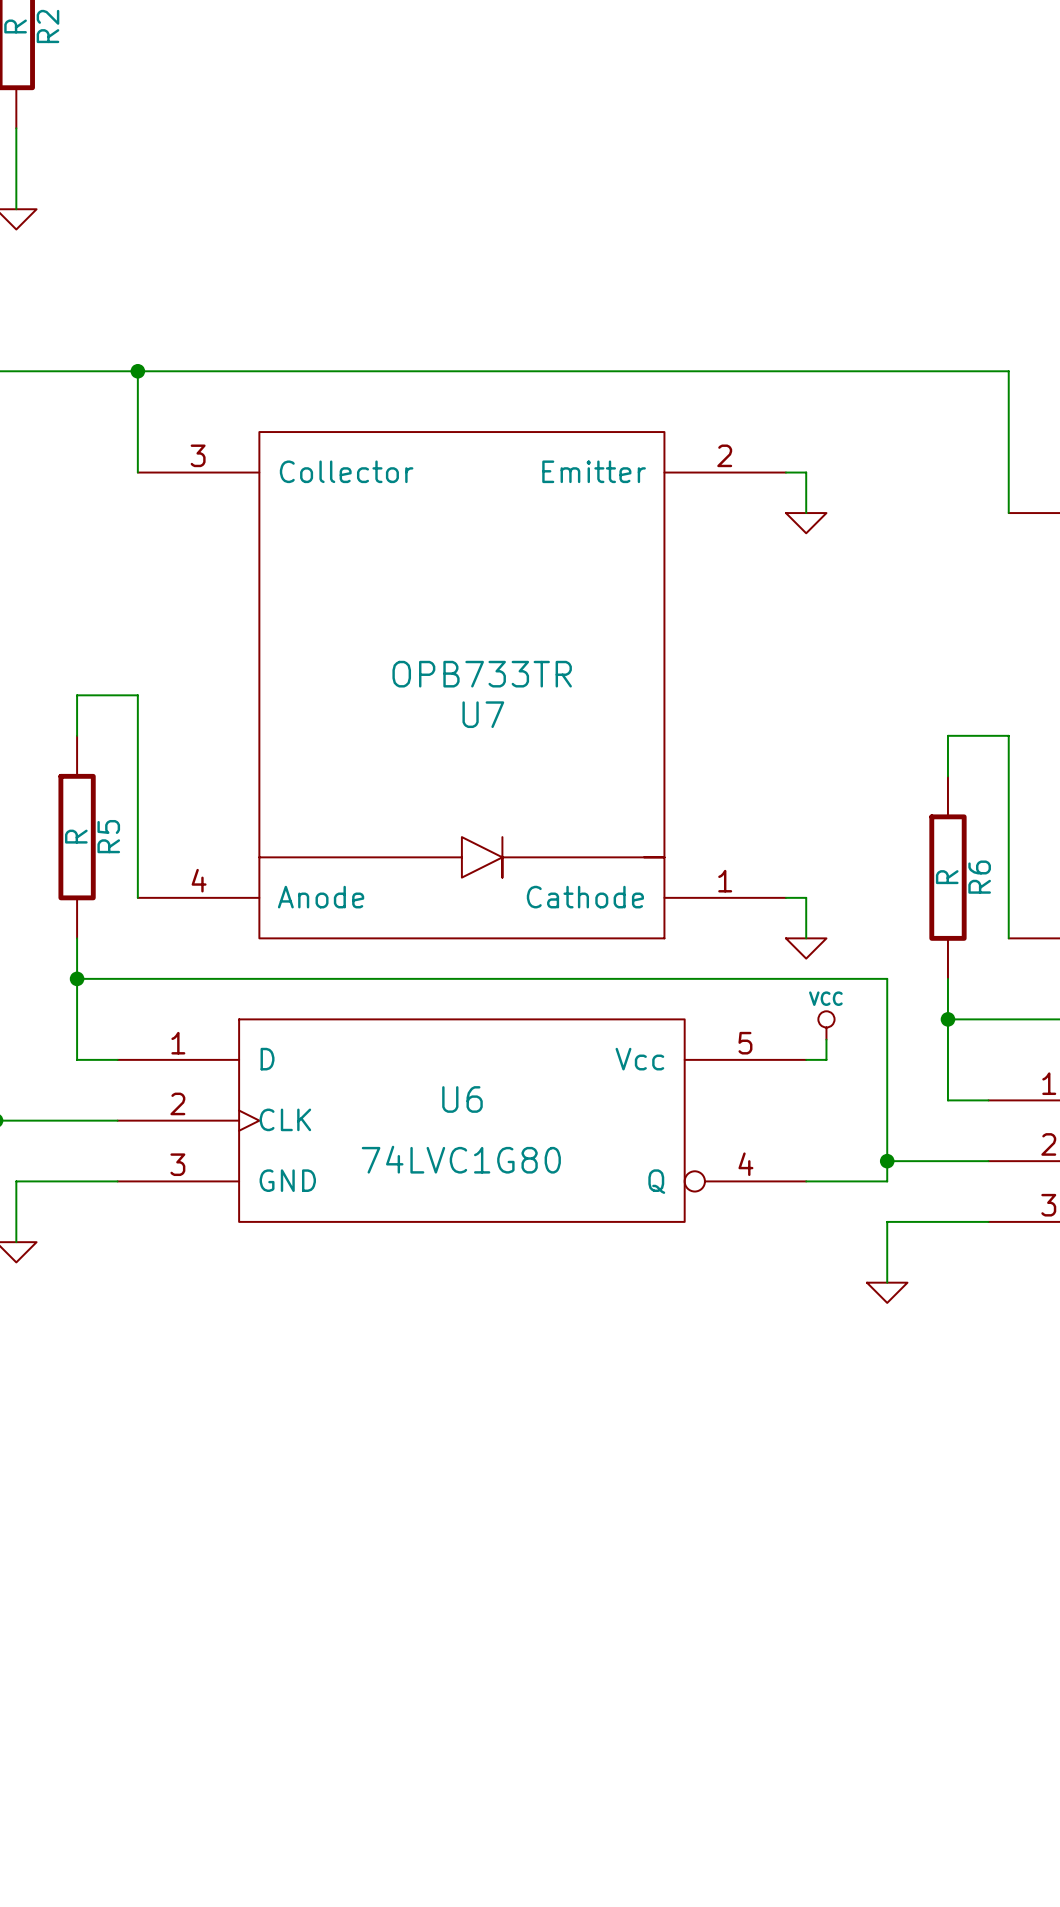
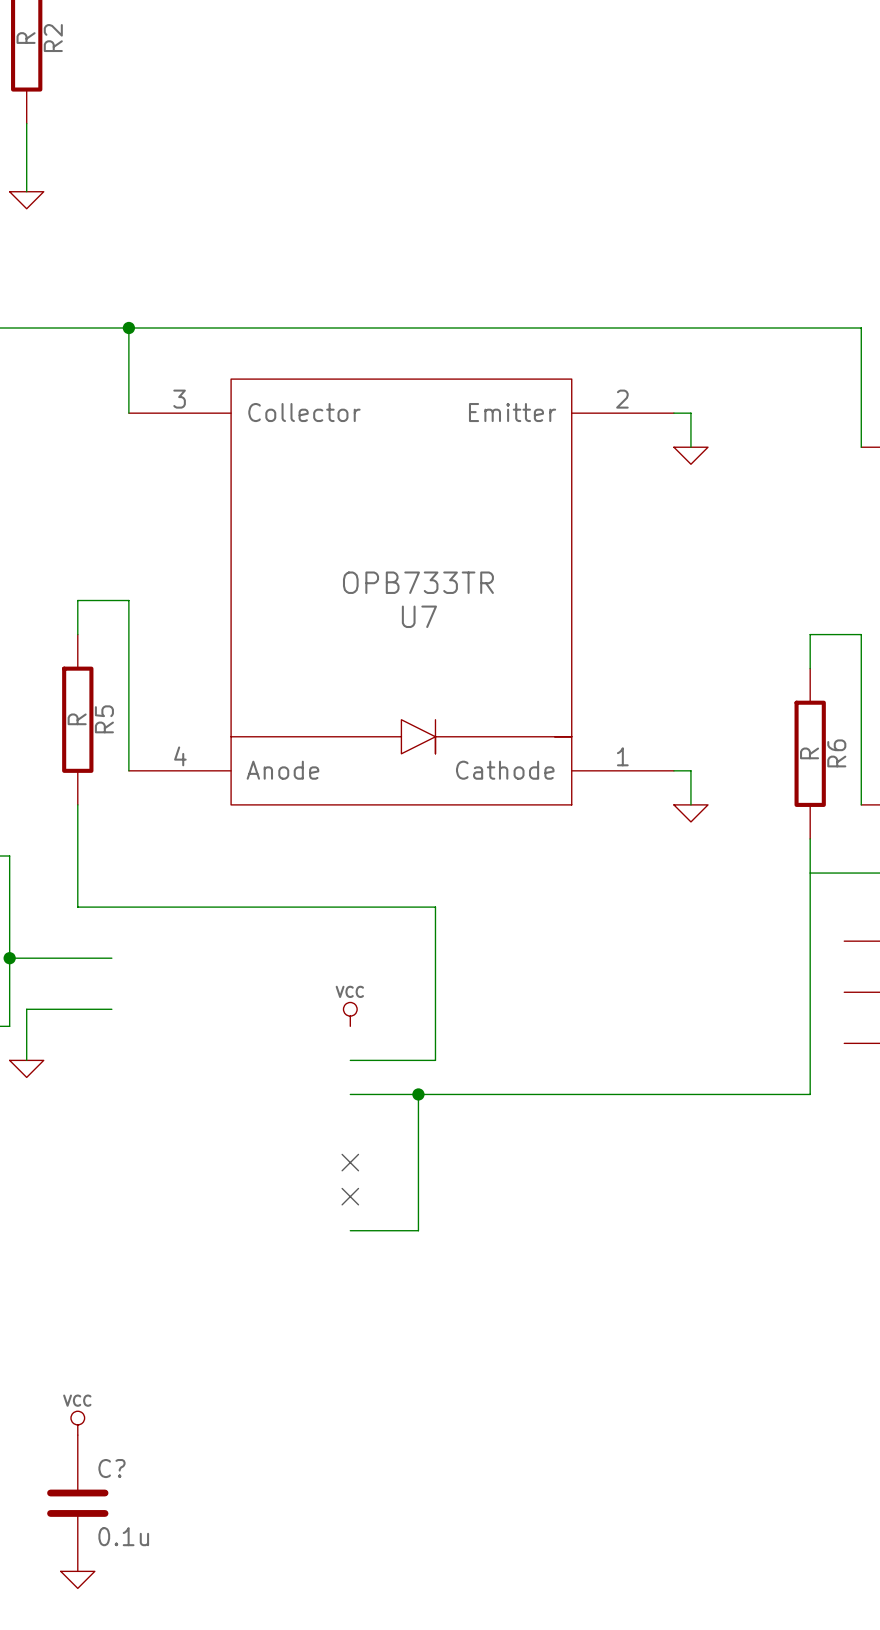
wire: (77, 978) (887, 978) (887, 1181) (806, 1181) -> none
junction: (77, 978) -> none
junction: (947, 1019) -> none
power symbol: VCC (826, 1025) -> none
wire: (826, 1039) (826, 1059) (806, 1059) -> none
wire: none -> (111, 907) (435, 907) (435, 1060) (350, 1060)
wire: (947, 1100) (988, 1100) -> (810, 941) (810, 1094) (350, 1094)
U6: 74LVC1G80 (461, 1120) -> none
wire: (887, 1161) (988, 1161) -> none
junction: (887, 1161) -> none
power symbol: none -> VCC (350, 1014)
wire: (988, 1221) (887, 1221) (887, 1282) -> none
wire: none -> (418, 1094) (418, 1230) (350, 1230)
junction: none -> (418, 1094)
power symbol: (887, 1292) -> none
no-connect mark: none -> (350, 1162)
no-connect mark: none -> (350, 1196)
power symbol: none -> VCC (77, 1423)
C?: none -> 0.1u (77, 1503)
power symbol: none -> (77, 1579)

